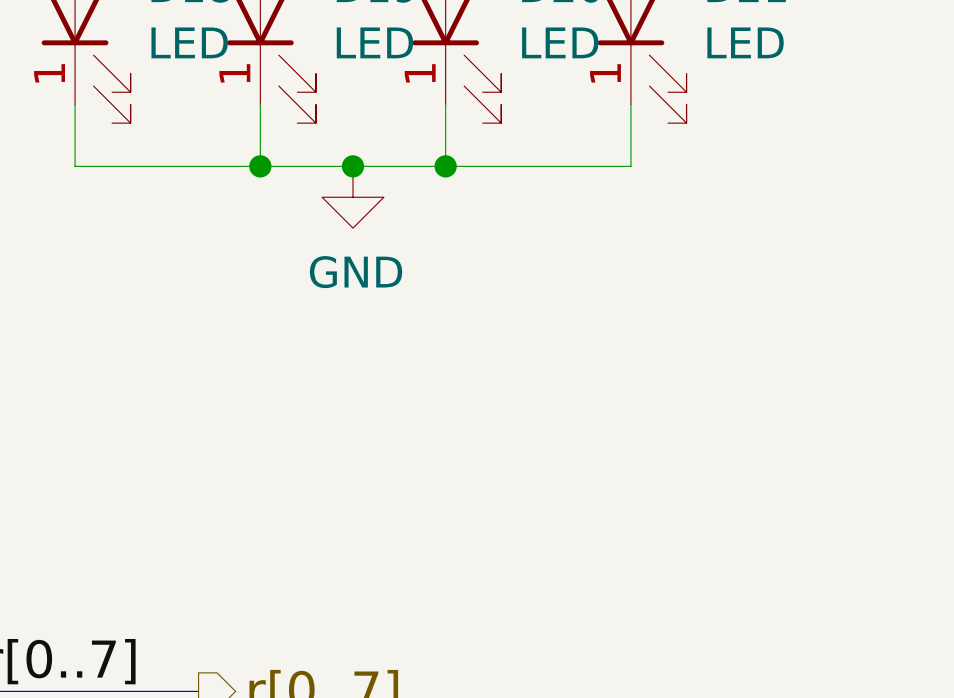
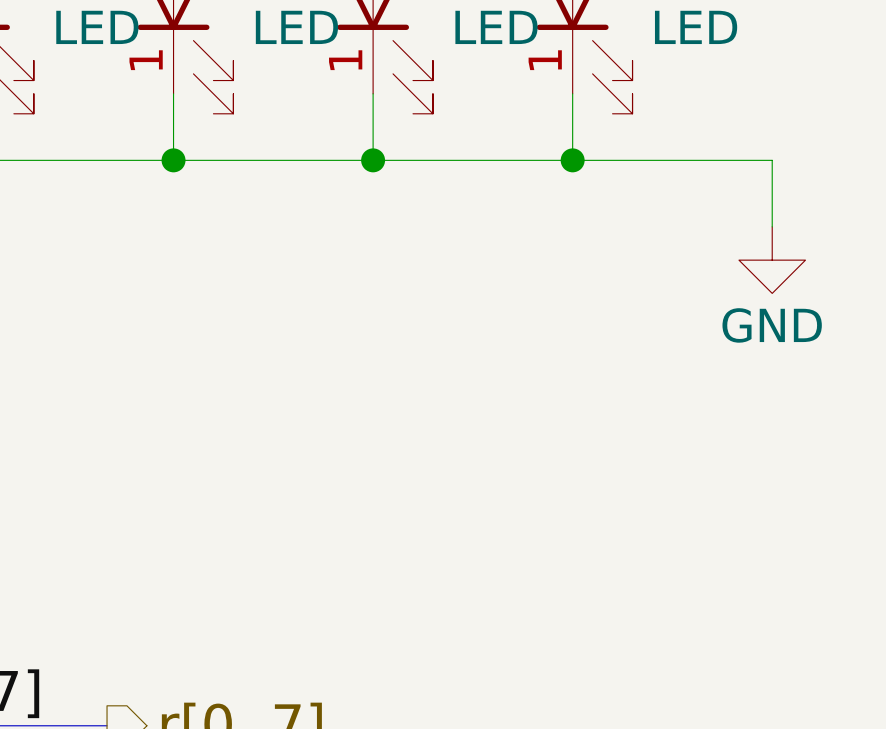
junction: (353, 166) -> none
wire: none -> (572, 160) (772, 160) (772, 226)
junction: none -> (572, 160)
power symbol position: GND (353, 197) -> GND (772, 260)
power symbol text position: GND (356, 272) -> GND (772, 325)

